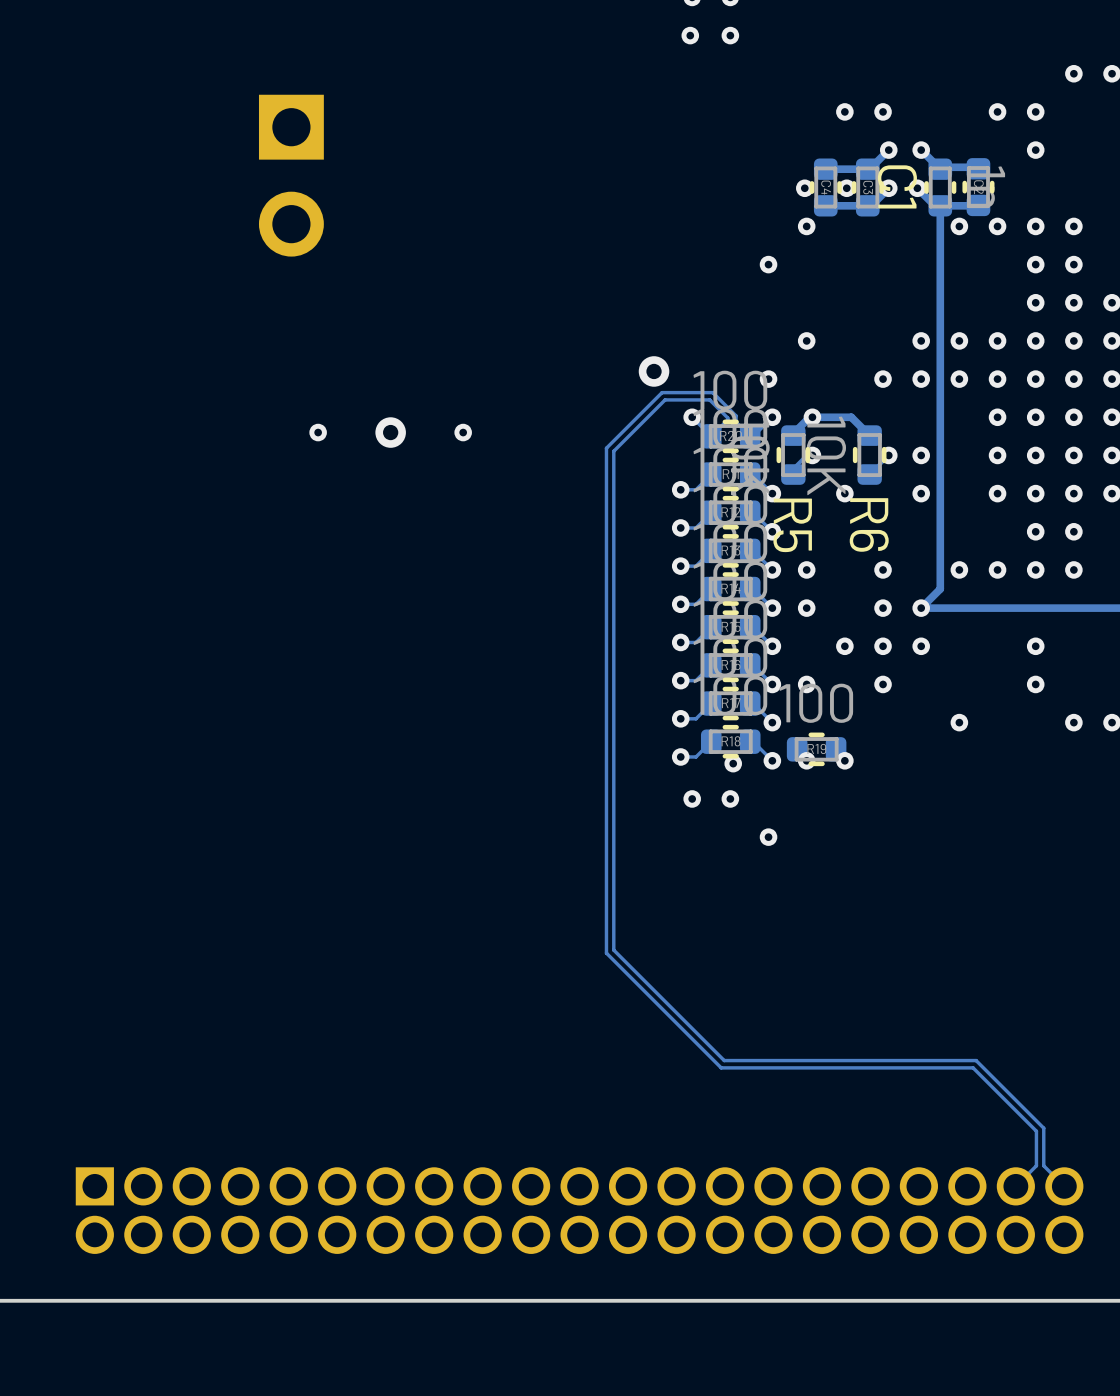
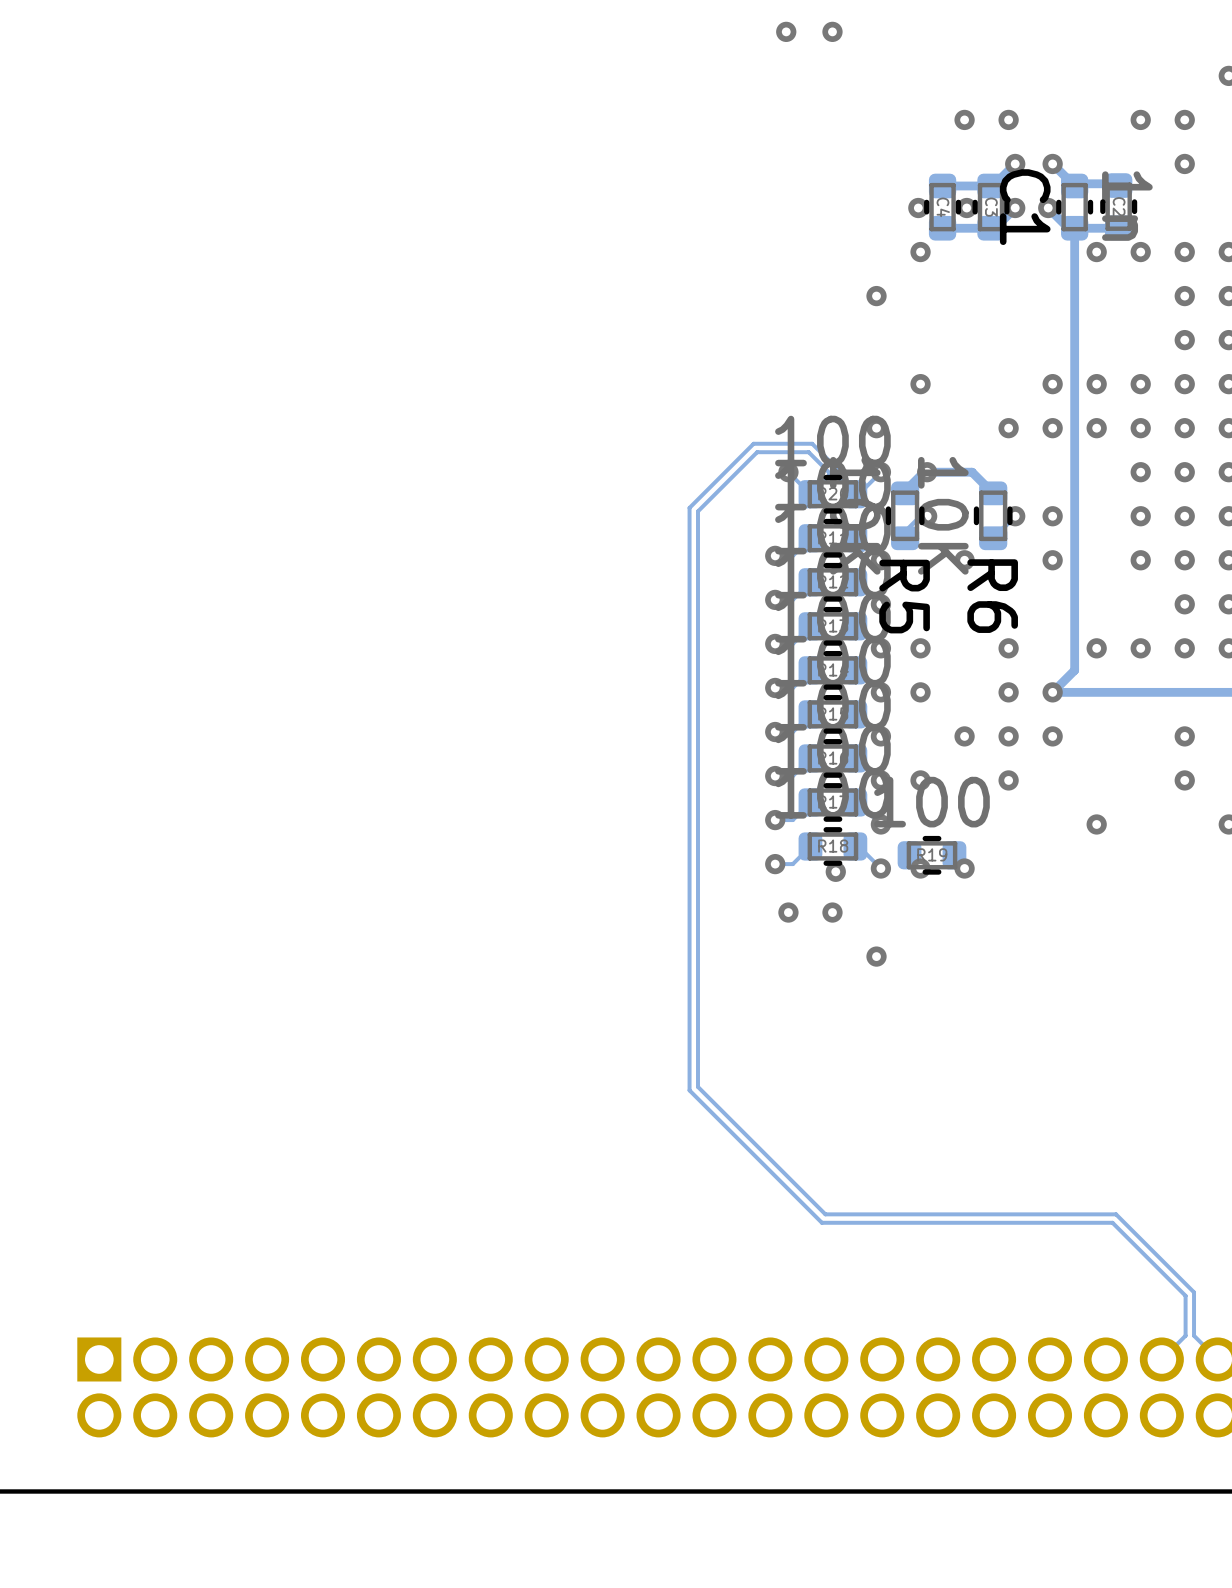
part: (291, 175) -> none
via: (654, 371) -> none
via: (318, 432) -> none
via: (390, 432) -> none
via: (463, 432) -> none

